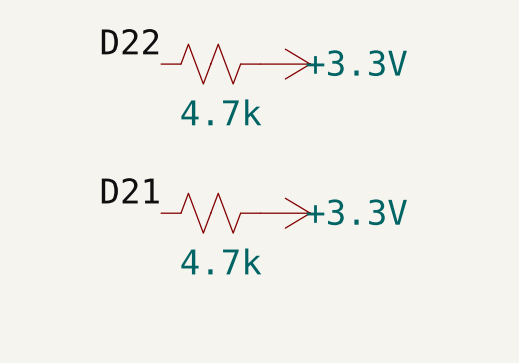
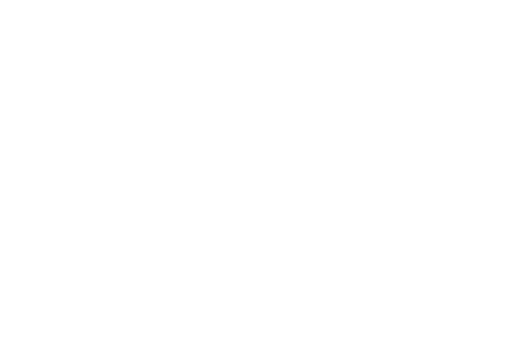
label: D22 (130, 41) -> none
part: 4.7k (210, 64) -> none
power symbol: +3.3V (285, 64) -> none
label: D21 (130, 190) -> none
part: 4.7k (210, 213) -> none
power symbol: +3.3V (285, 213) -> none

